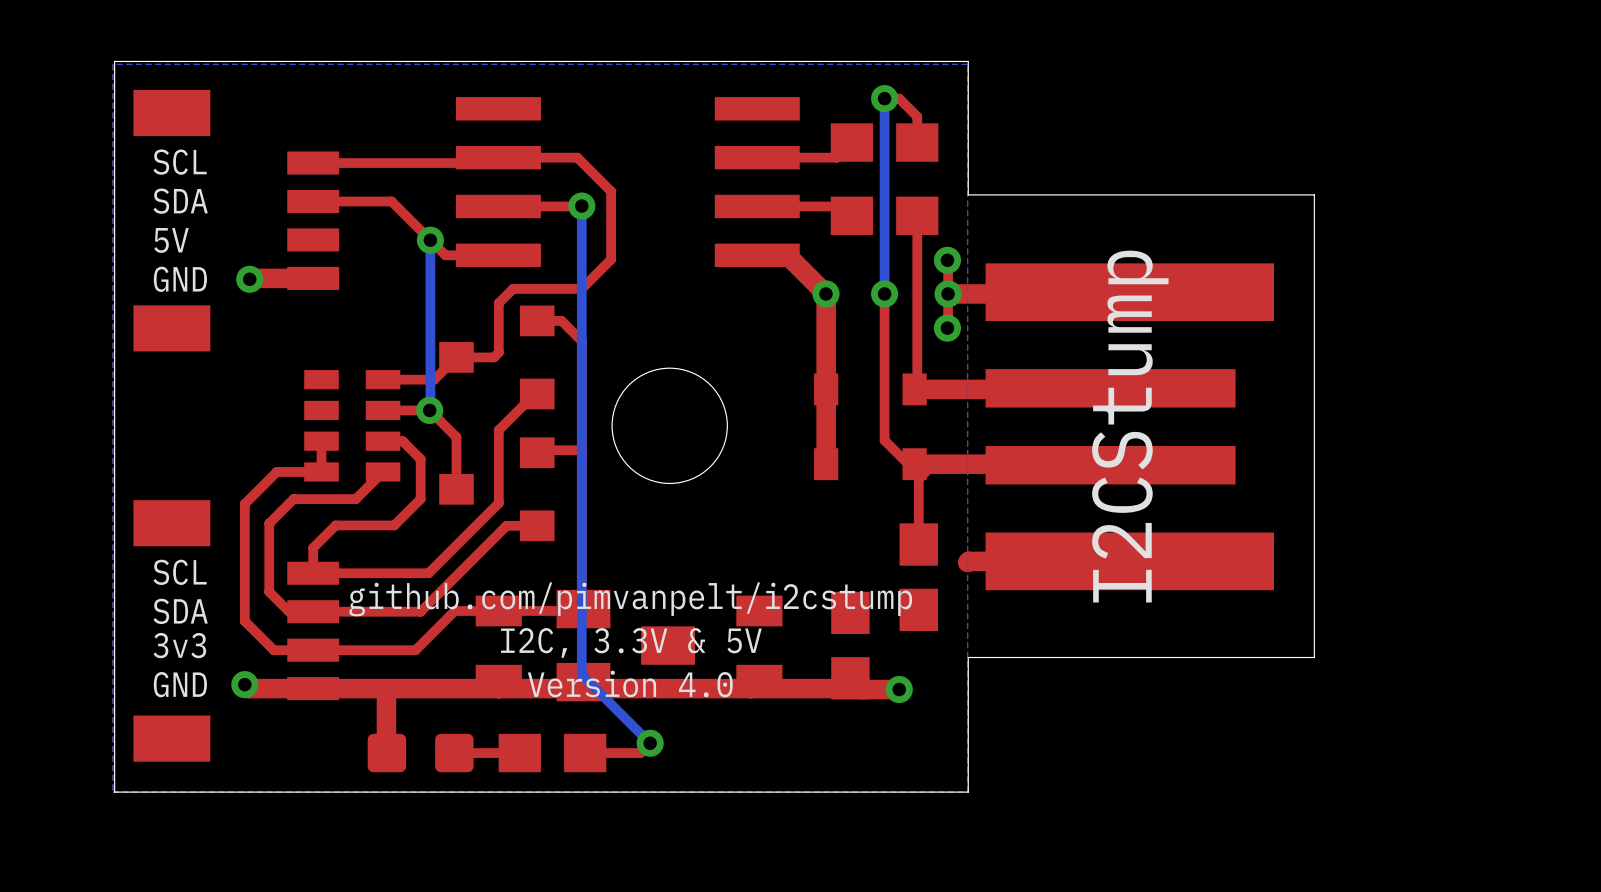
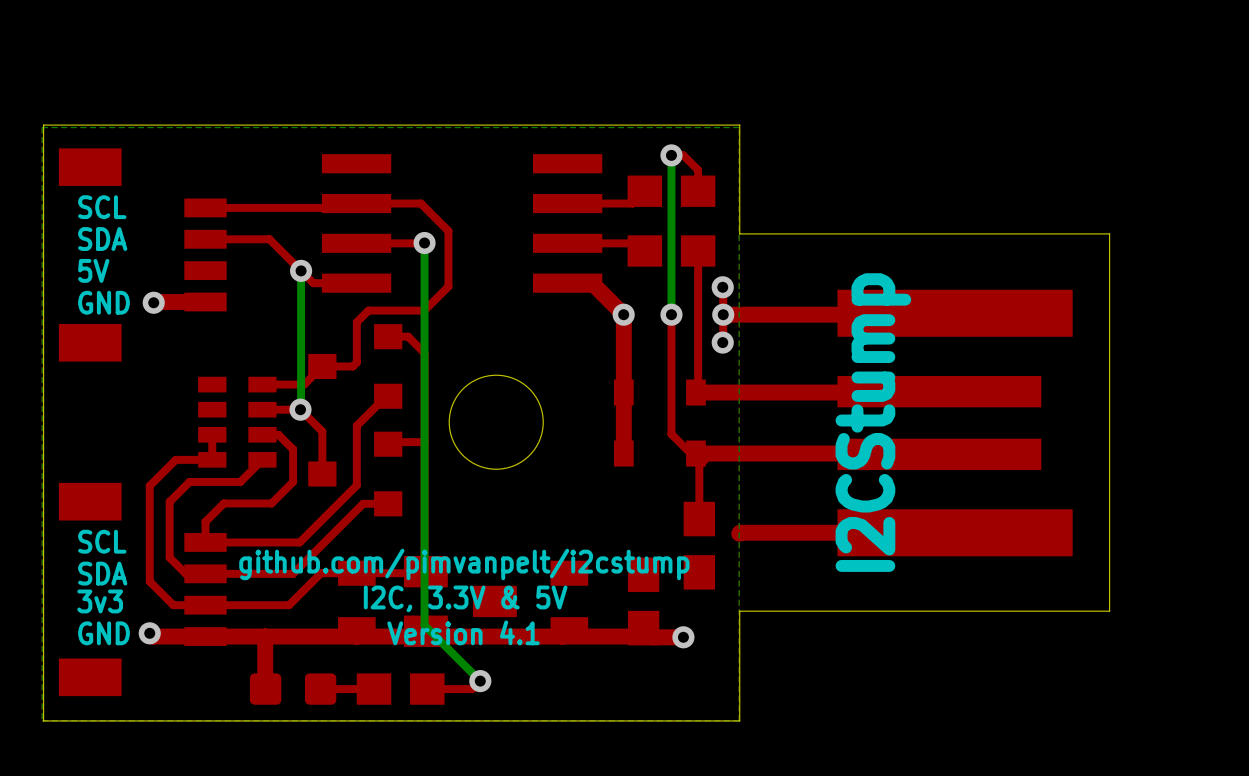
board edge: (1314, 194) (1314, 657) -> (1021, 233) (1109, 233) (1109, 611) (1021, 611)
part position: (1129, 426) -> (955, 423)
text: Version 4.0 (630, 683) -> Version 4.1 (463, 632)

